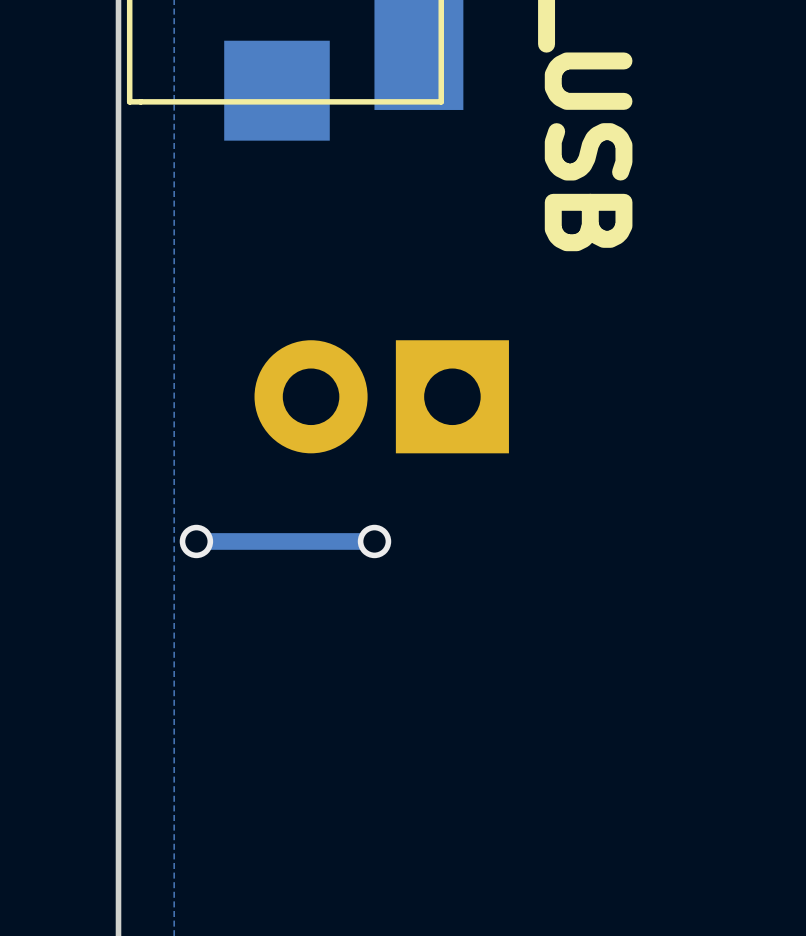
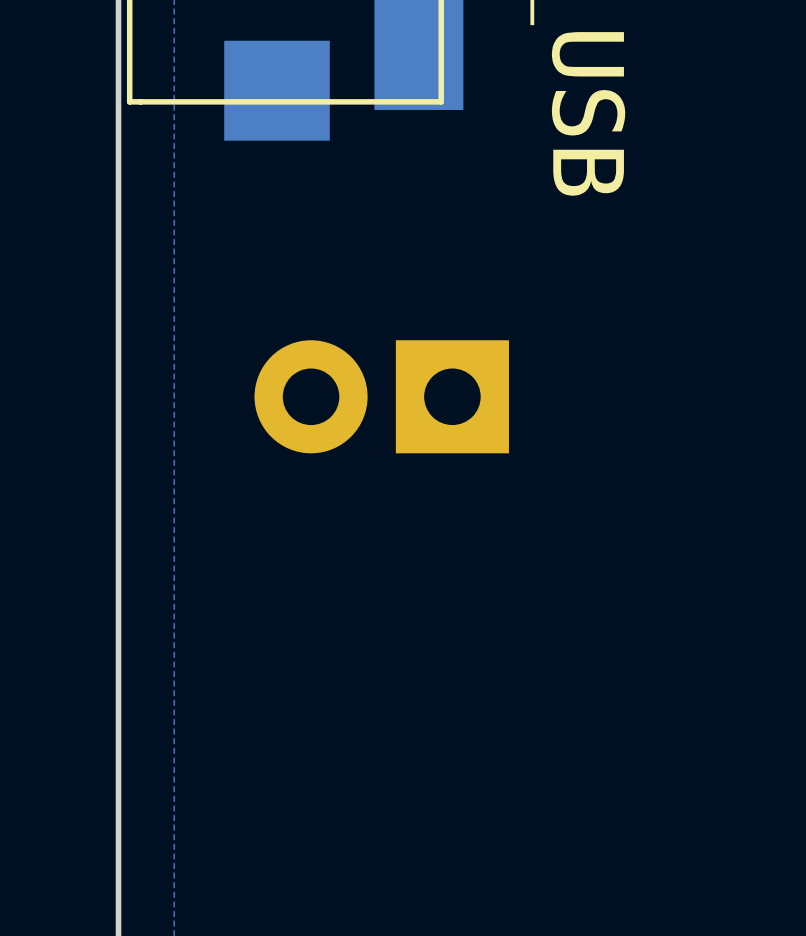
via: (196, 541) -> none
track: (374, 541) (196, 541) -> none
via: (374, 541) -> none

